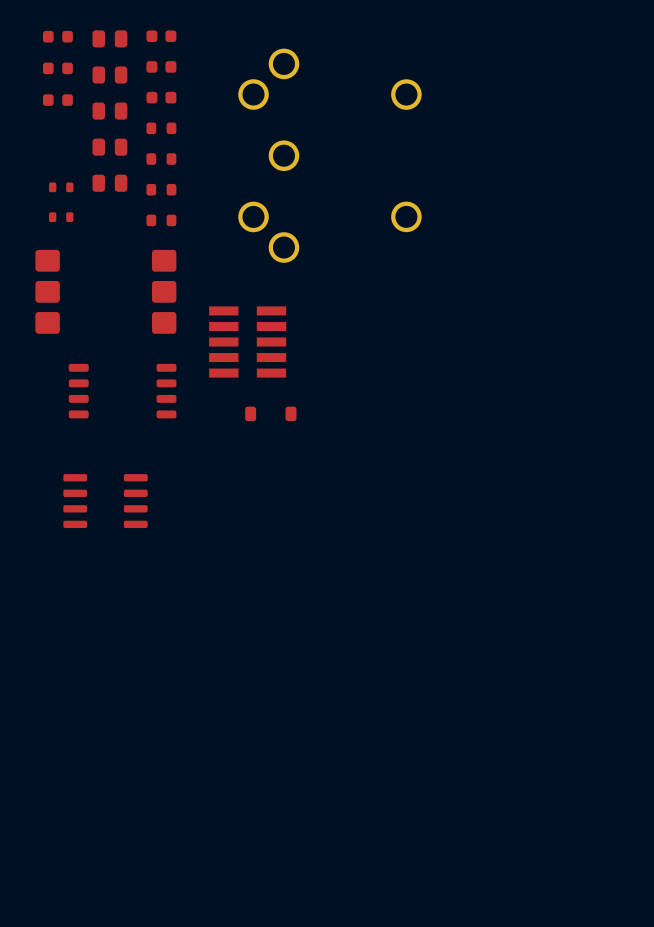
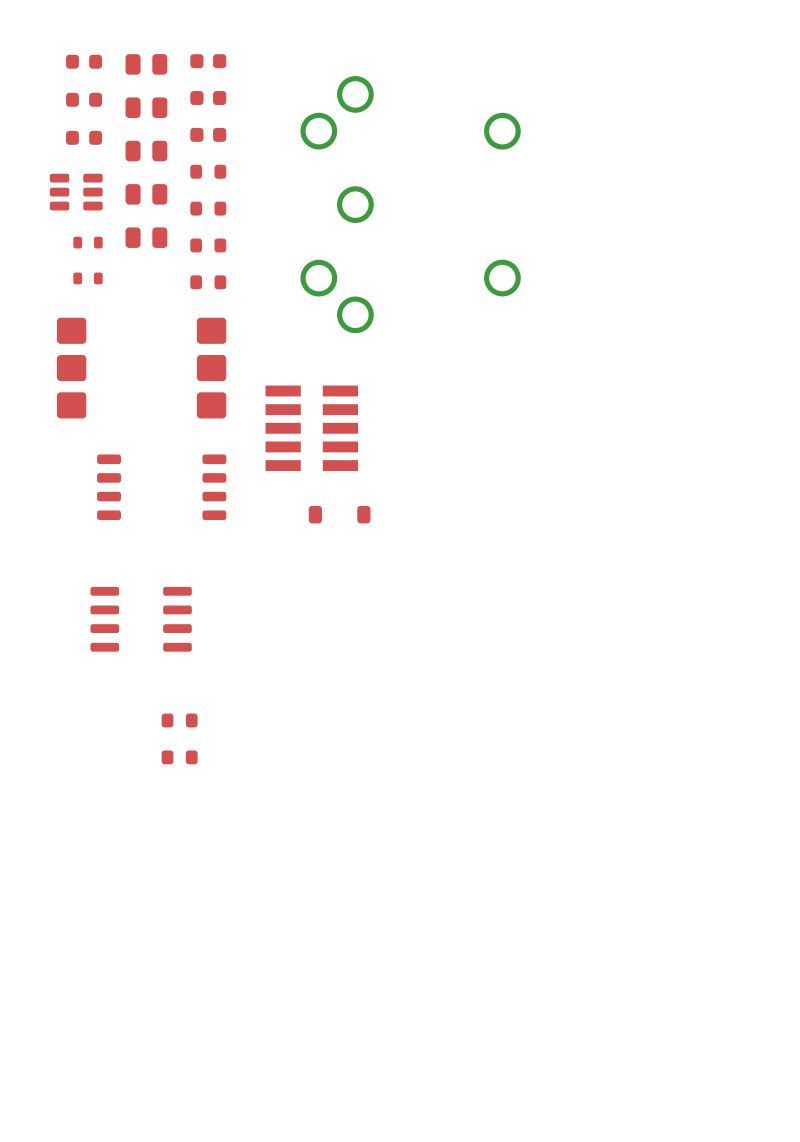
part: none -> (76, 192)
part: none -> (179, 720)
part: none -> (179, 757)

